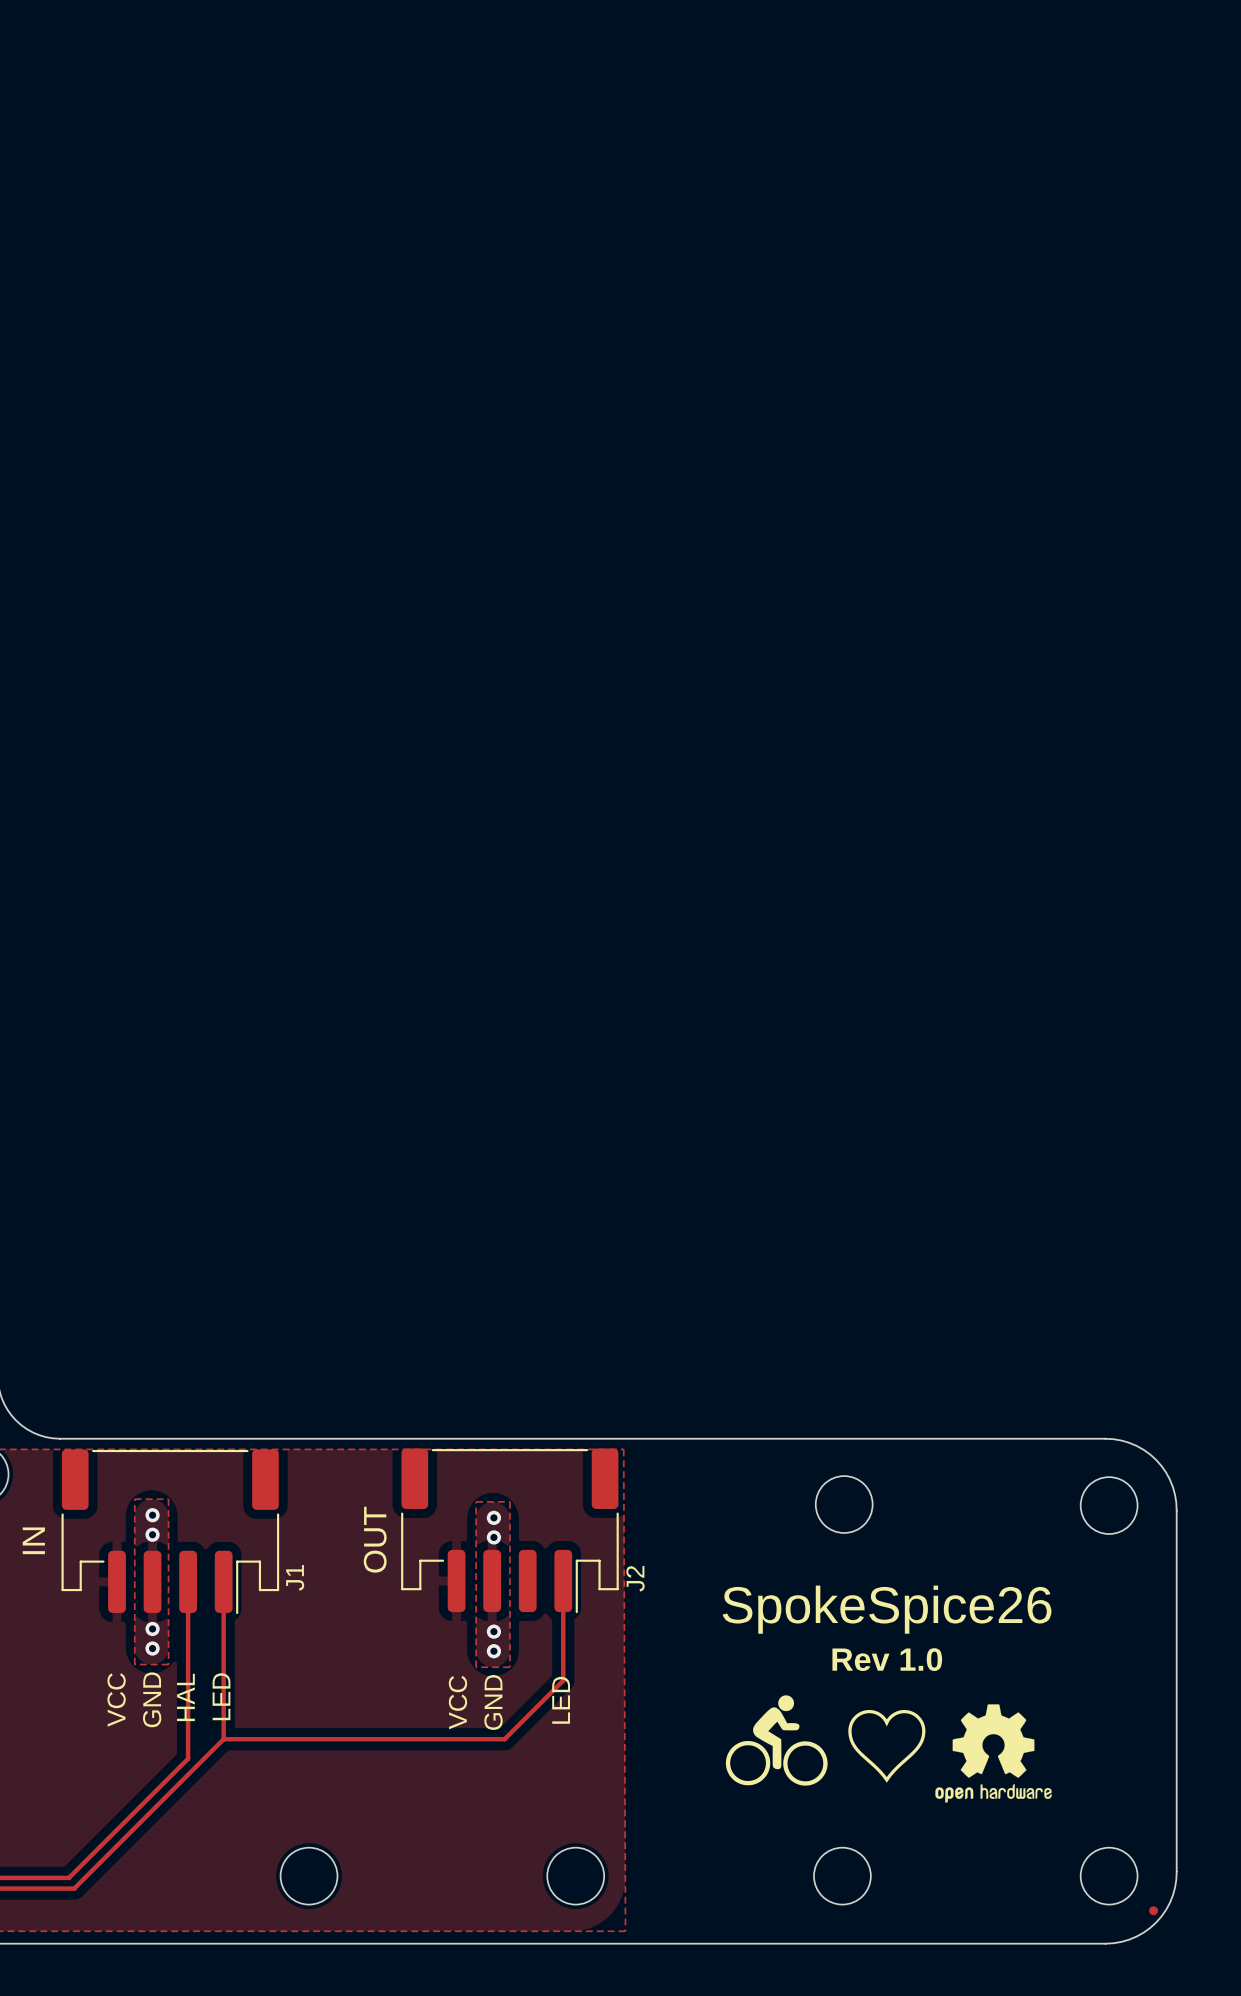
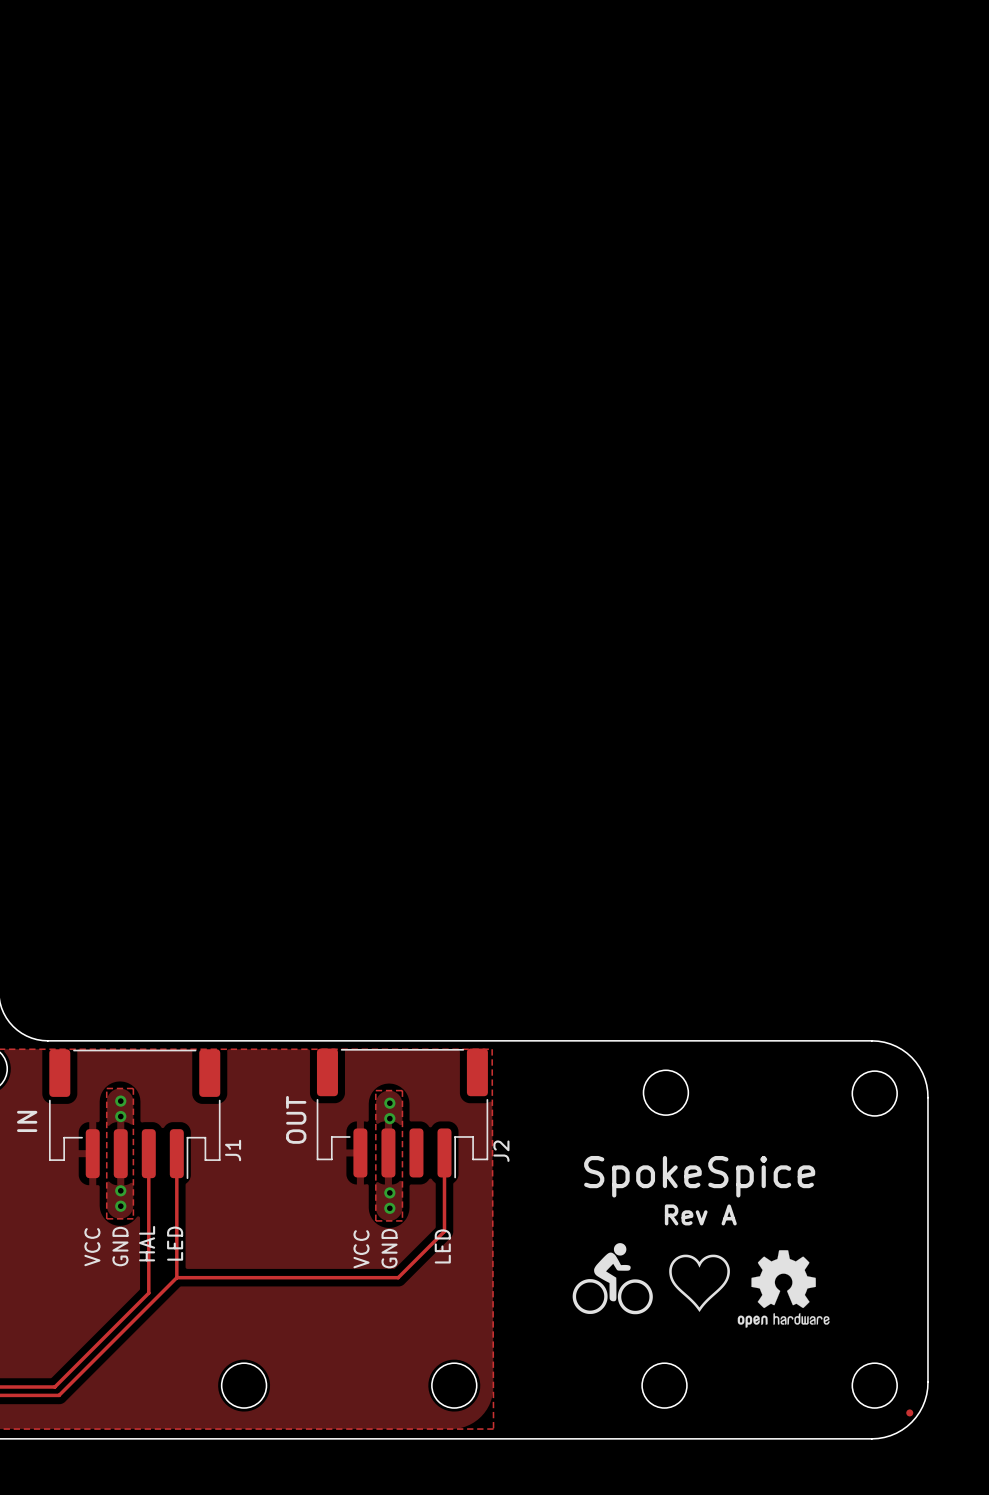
text: SpokeSpice26 (887, 1609) -> SpokeSpice (699, 1176)
text: Rev 1.0 (887, 1659) -> Rev A (700, 1214)

